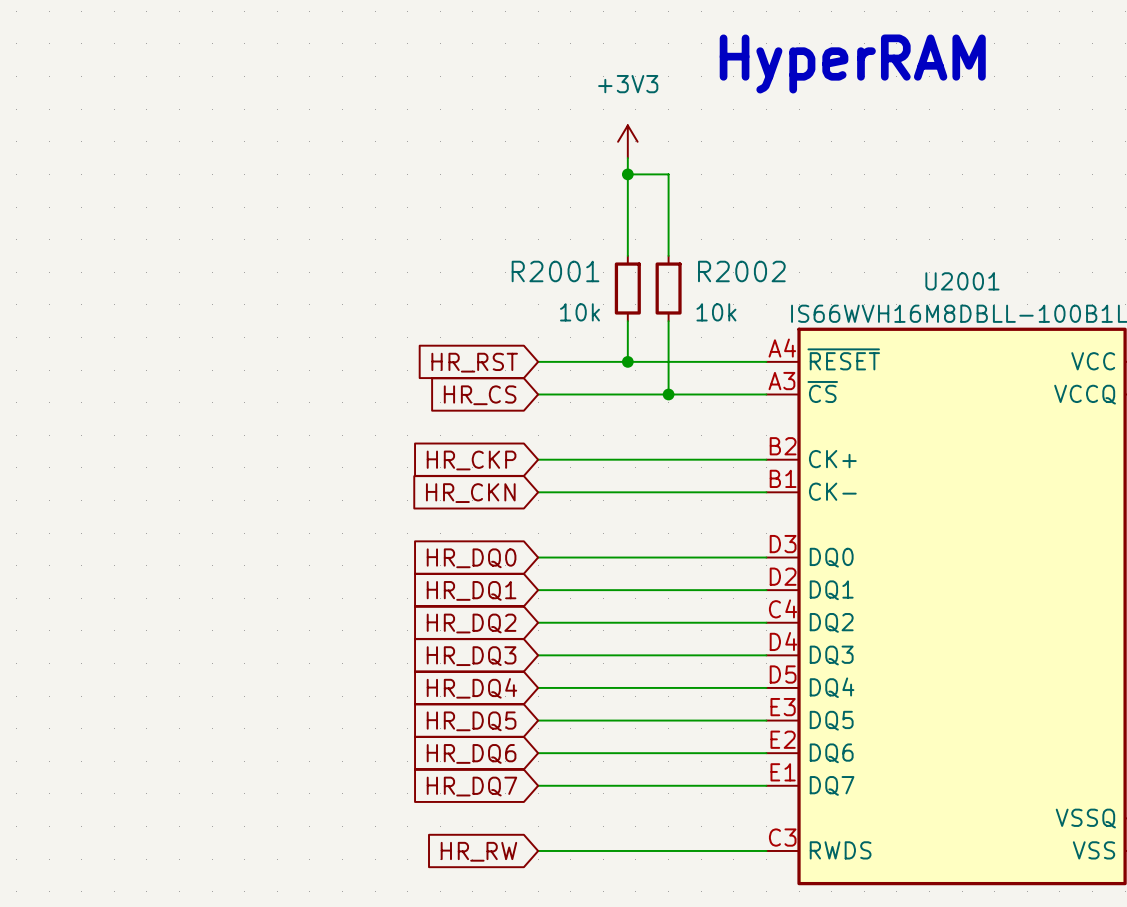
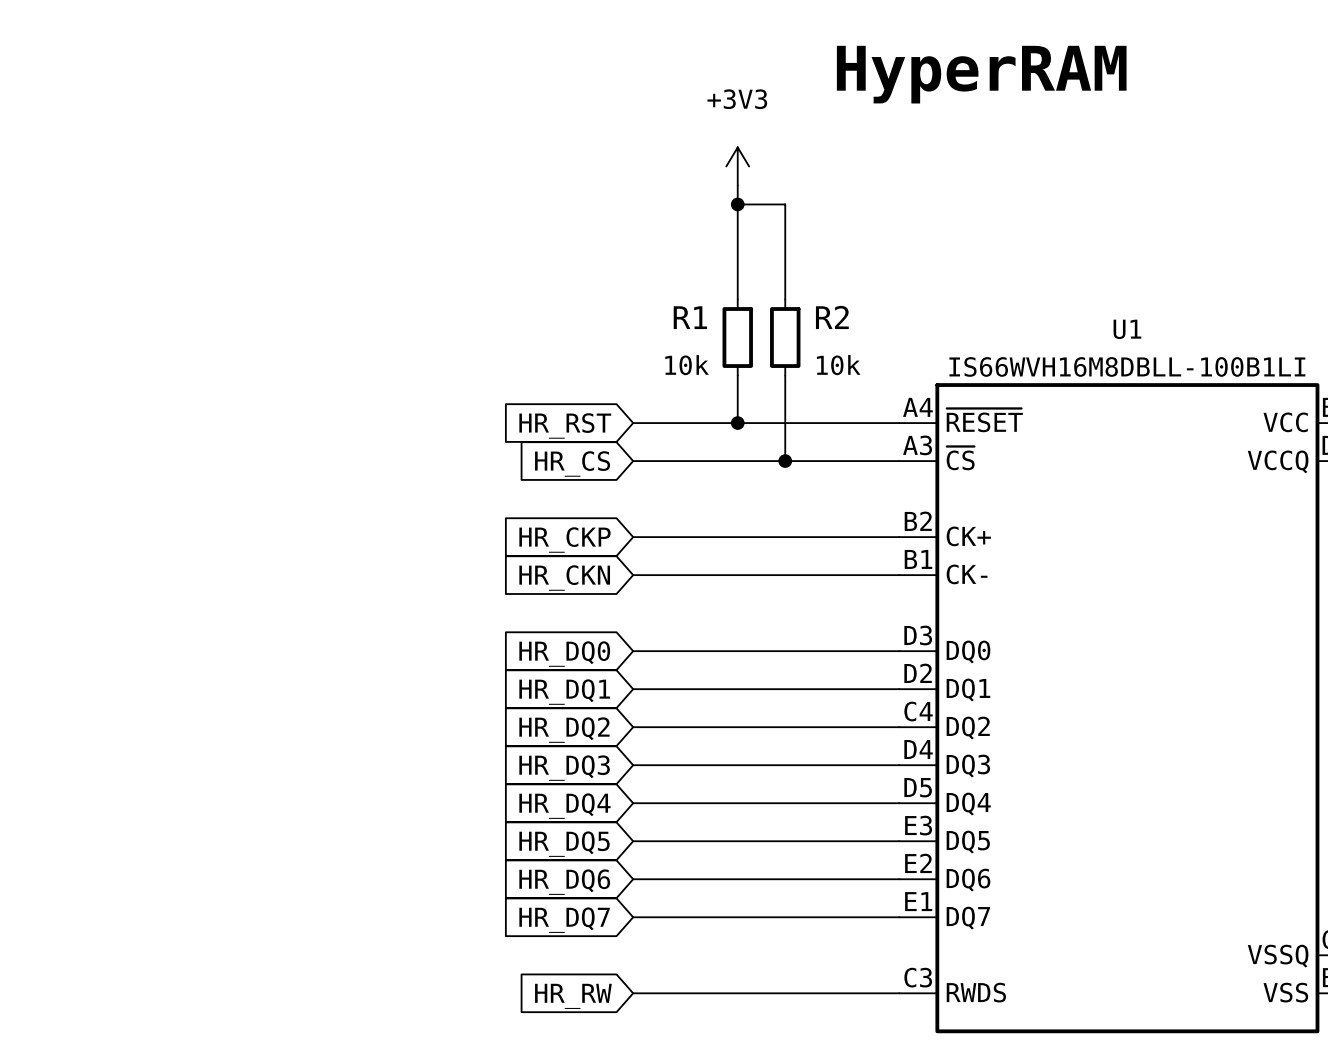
R2001 name: R2001 (555, 271) -> R1 (690, 317)
R2002 name: R2002 (741, 271) -> R2 (832, 317)
U2001 name: U2001 (962, 281) -> U1 (1127, 329)

